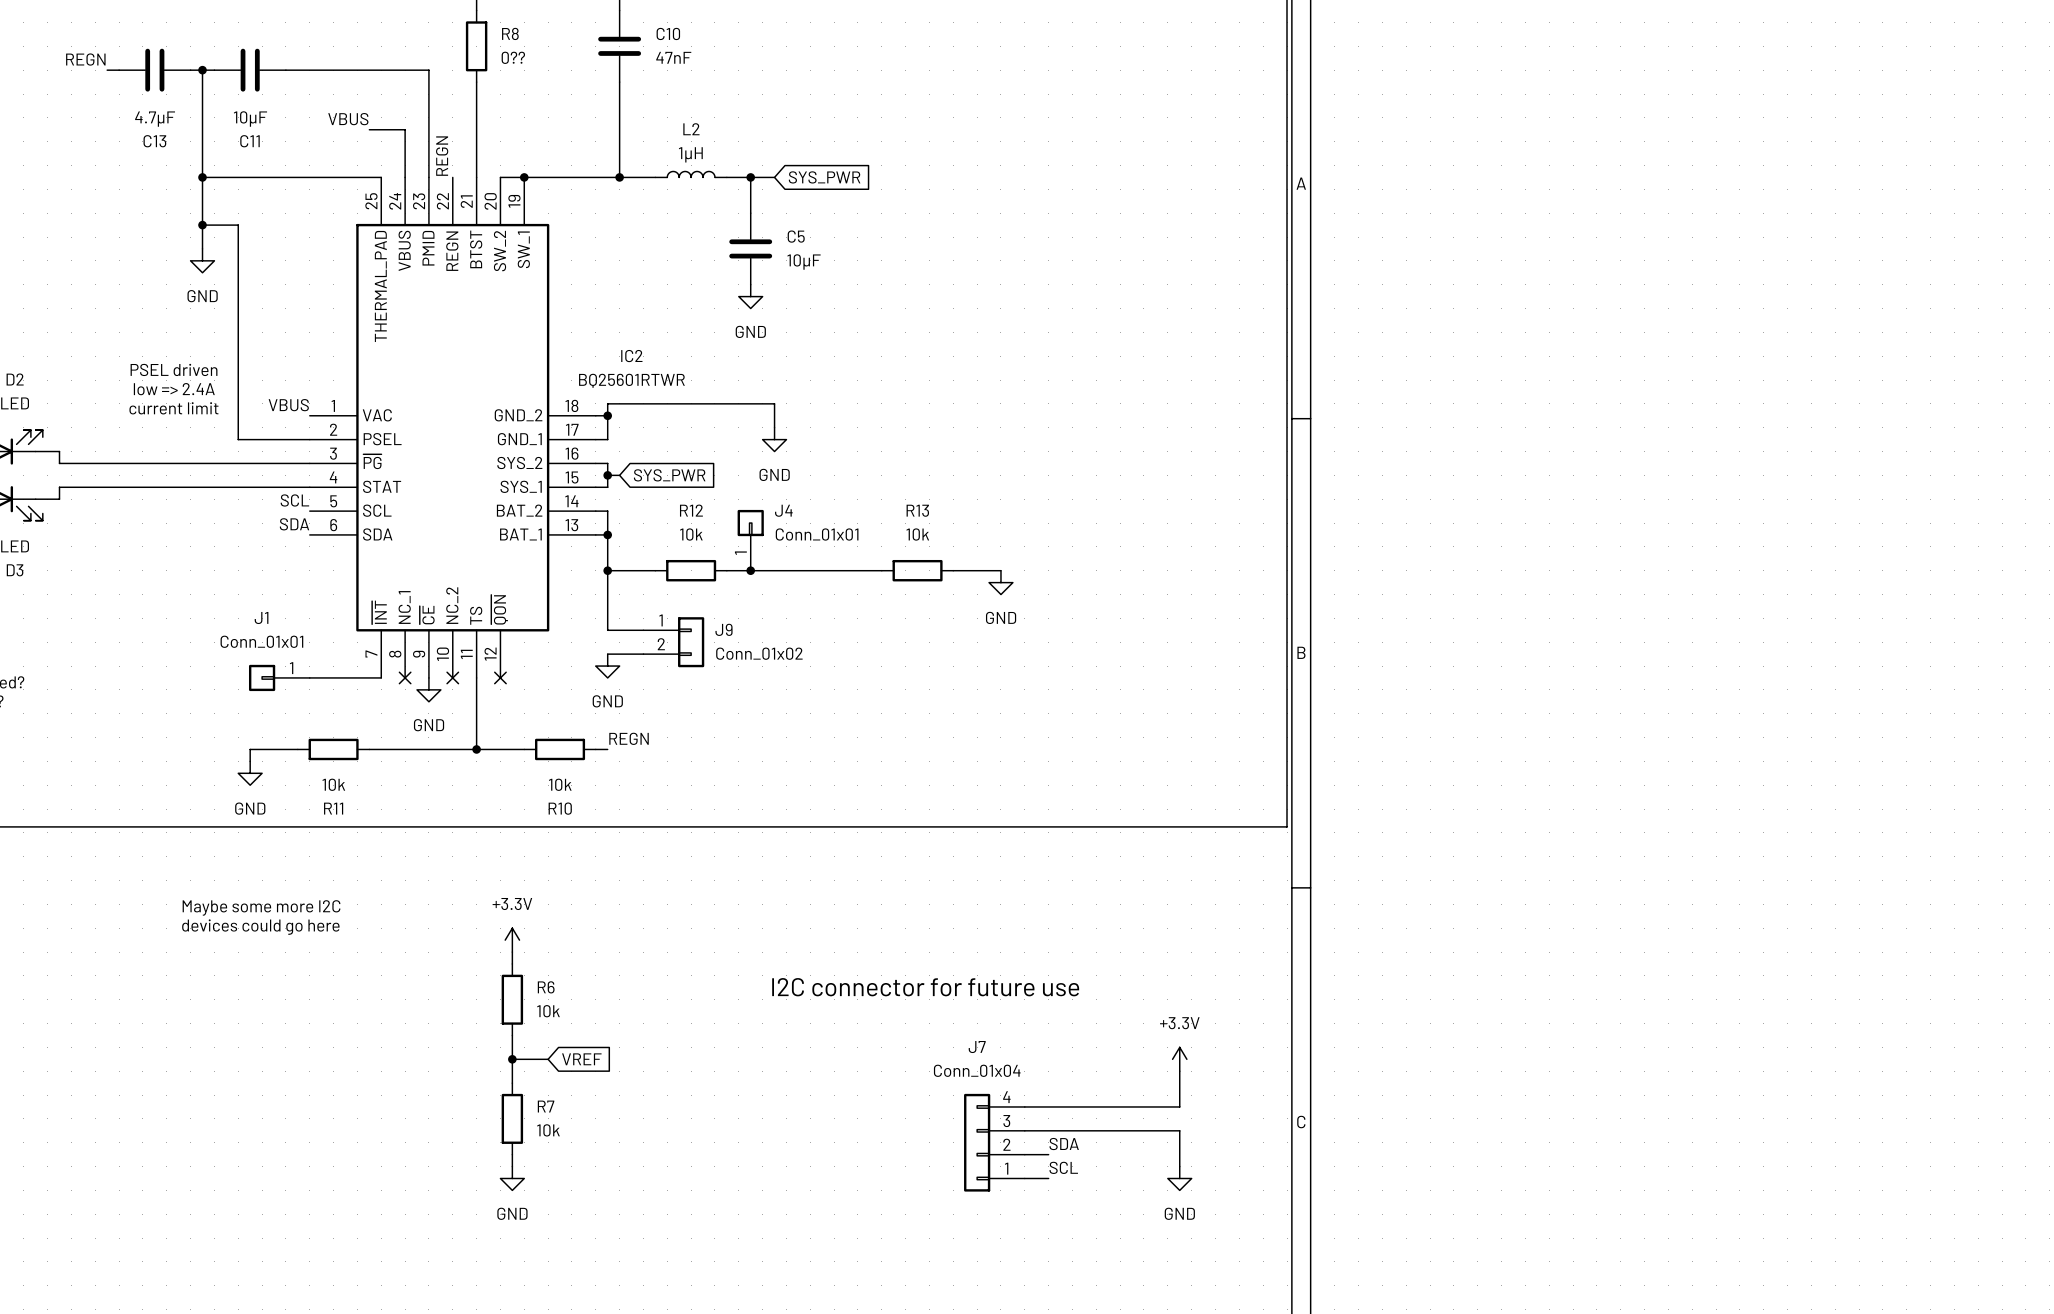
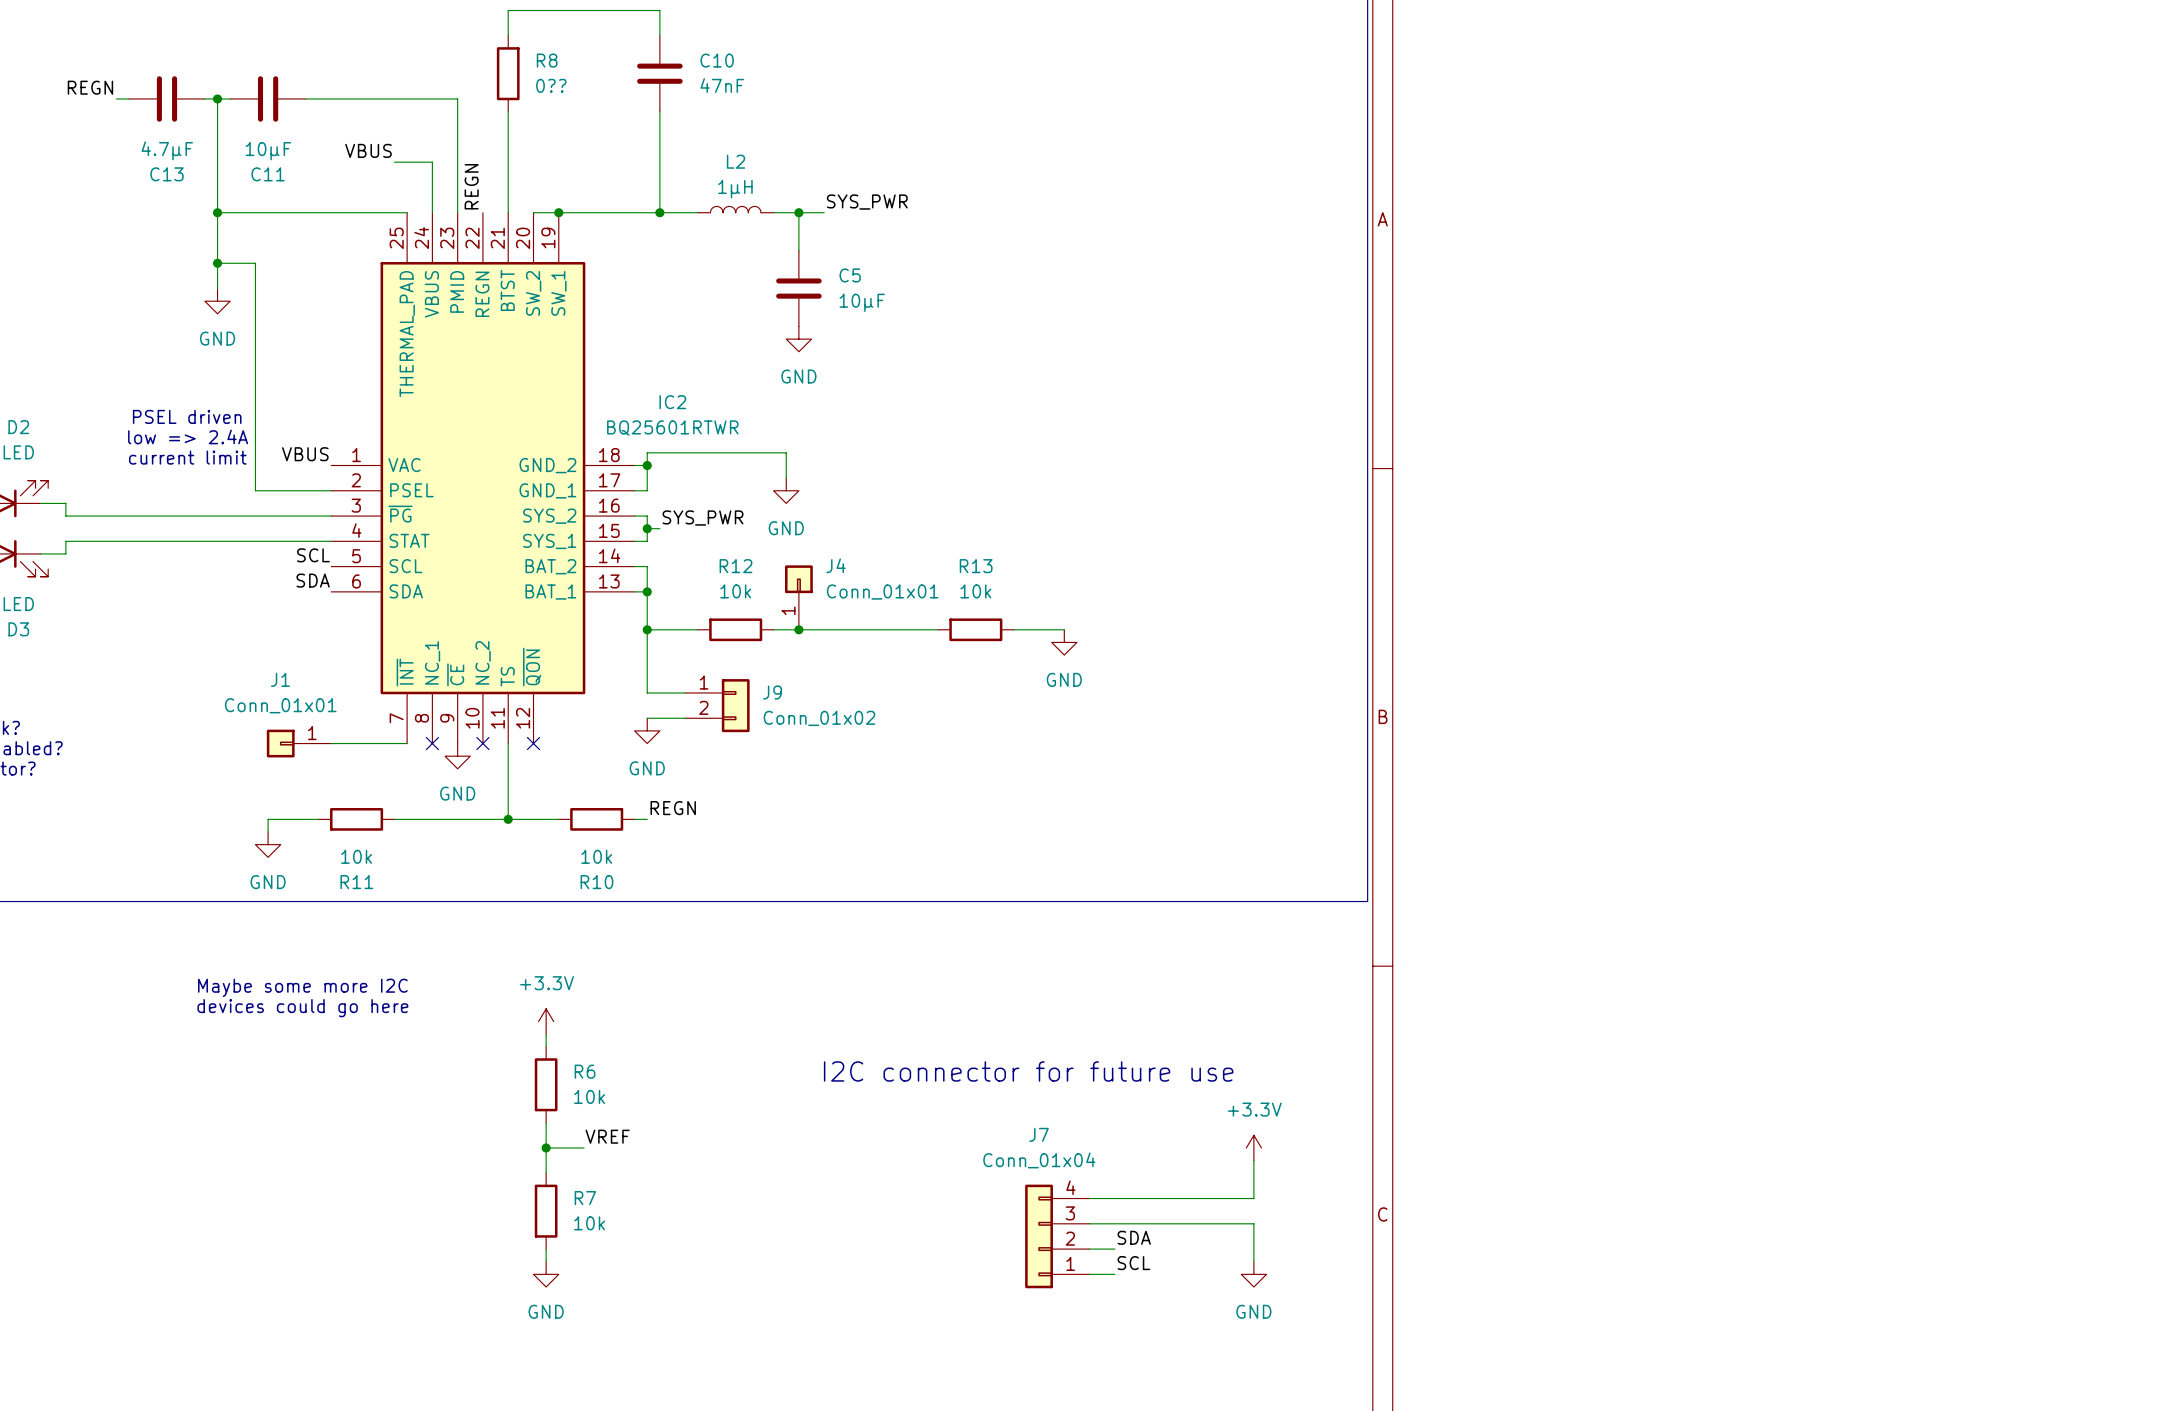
label: none -> SYS_PWR (867, 202)
global label: SYS_PWR (824, 177) -> none
wire: (738, 403) (774, 403) (774, 427) -> (786, 452) (786, 478)
power symbol position: GND (774, 439) -> GND (786, 490)
label: none -> SYS_PWR (703, 518)
global label: SYS_PWR (669, 475) -> none
label: none -> VREF (607, 1136)
global label: VREF (581, 1059) -> none

